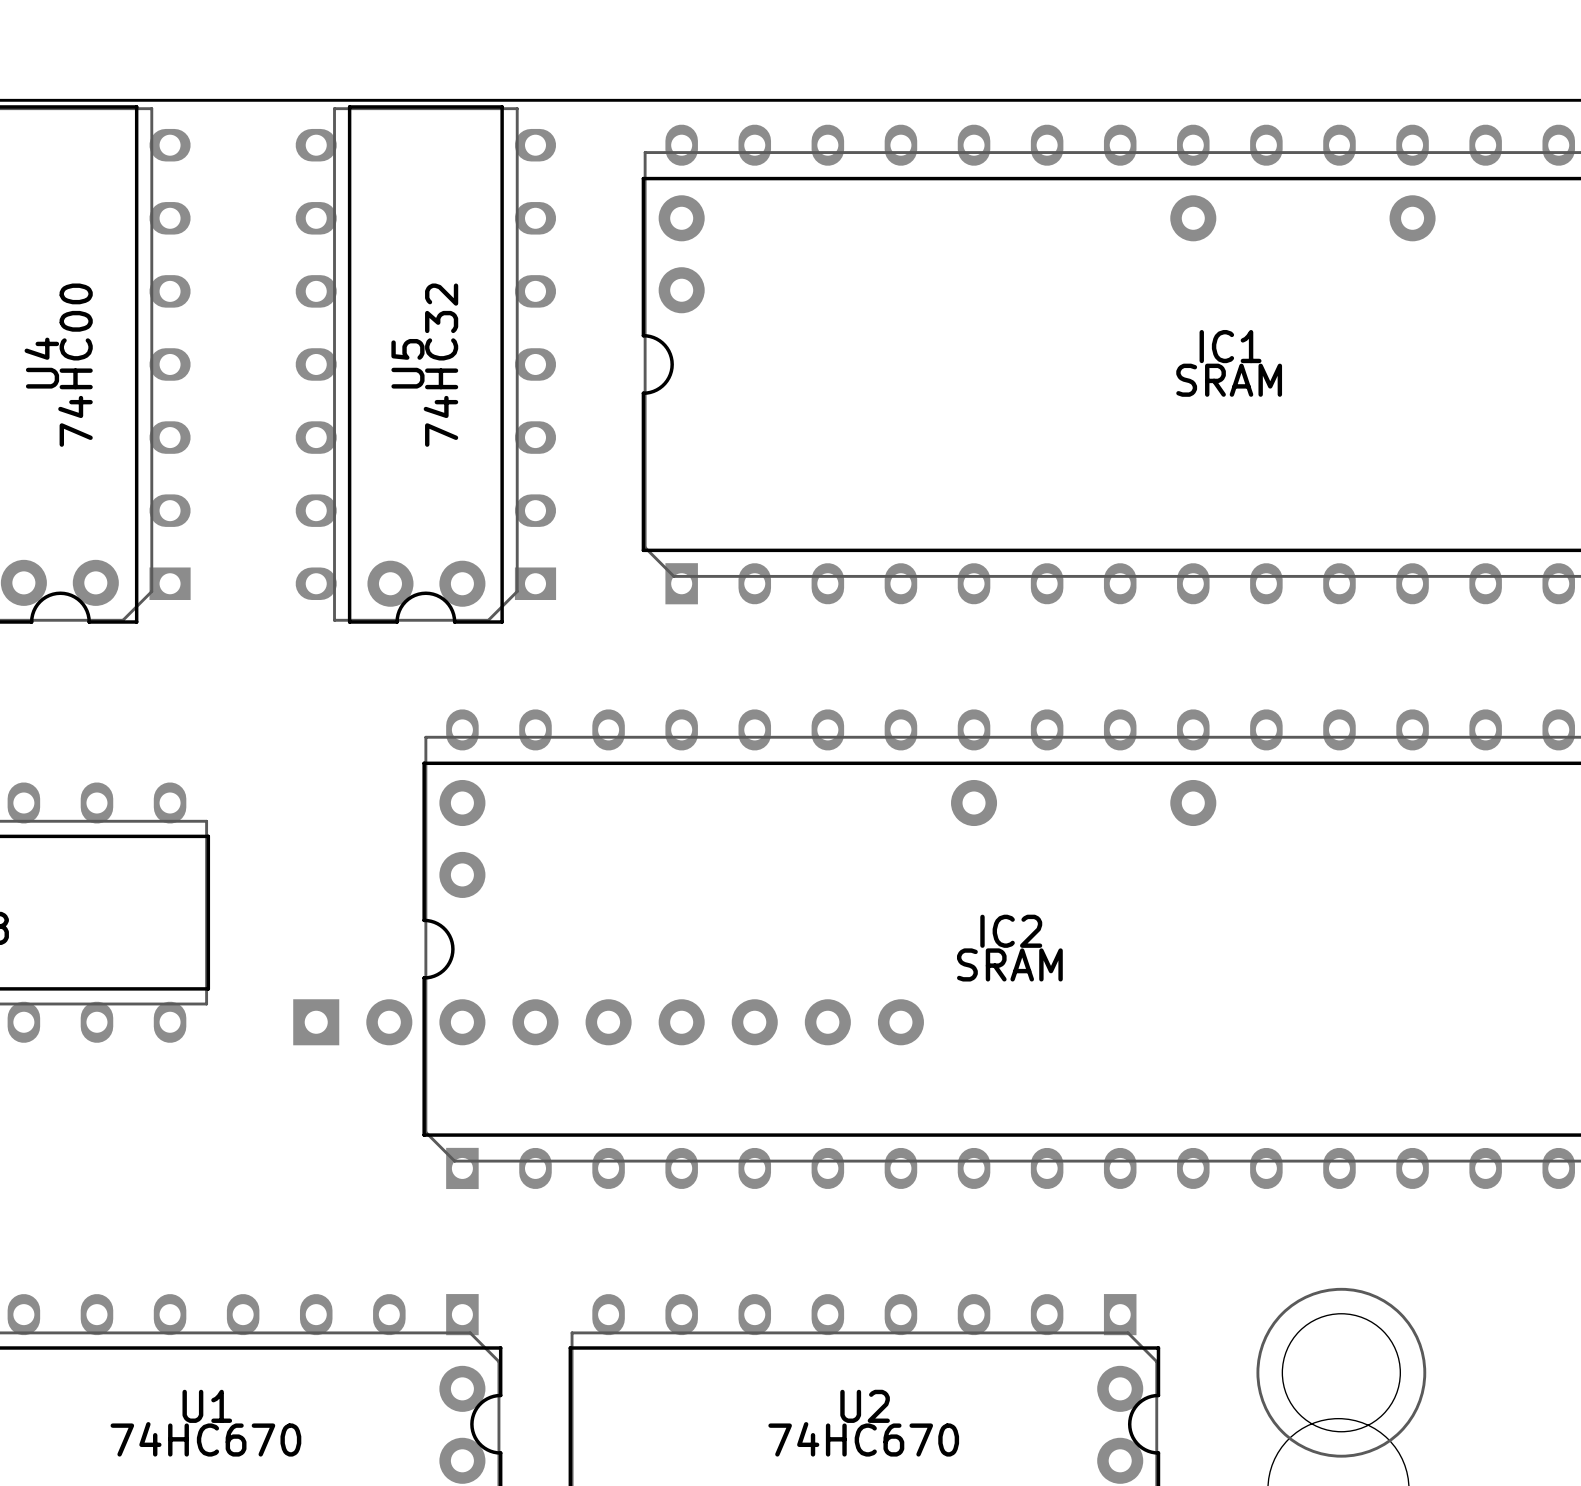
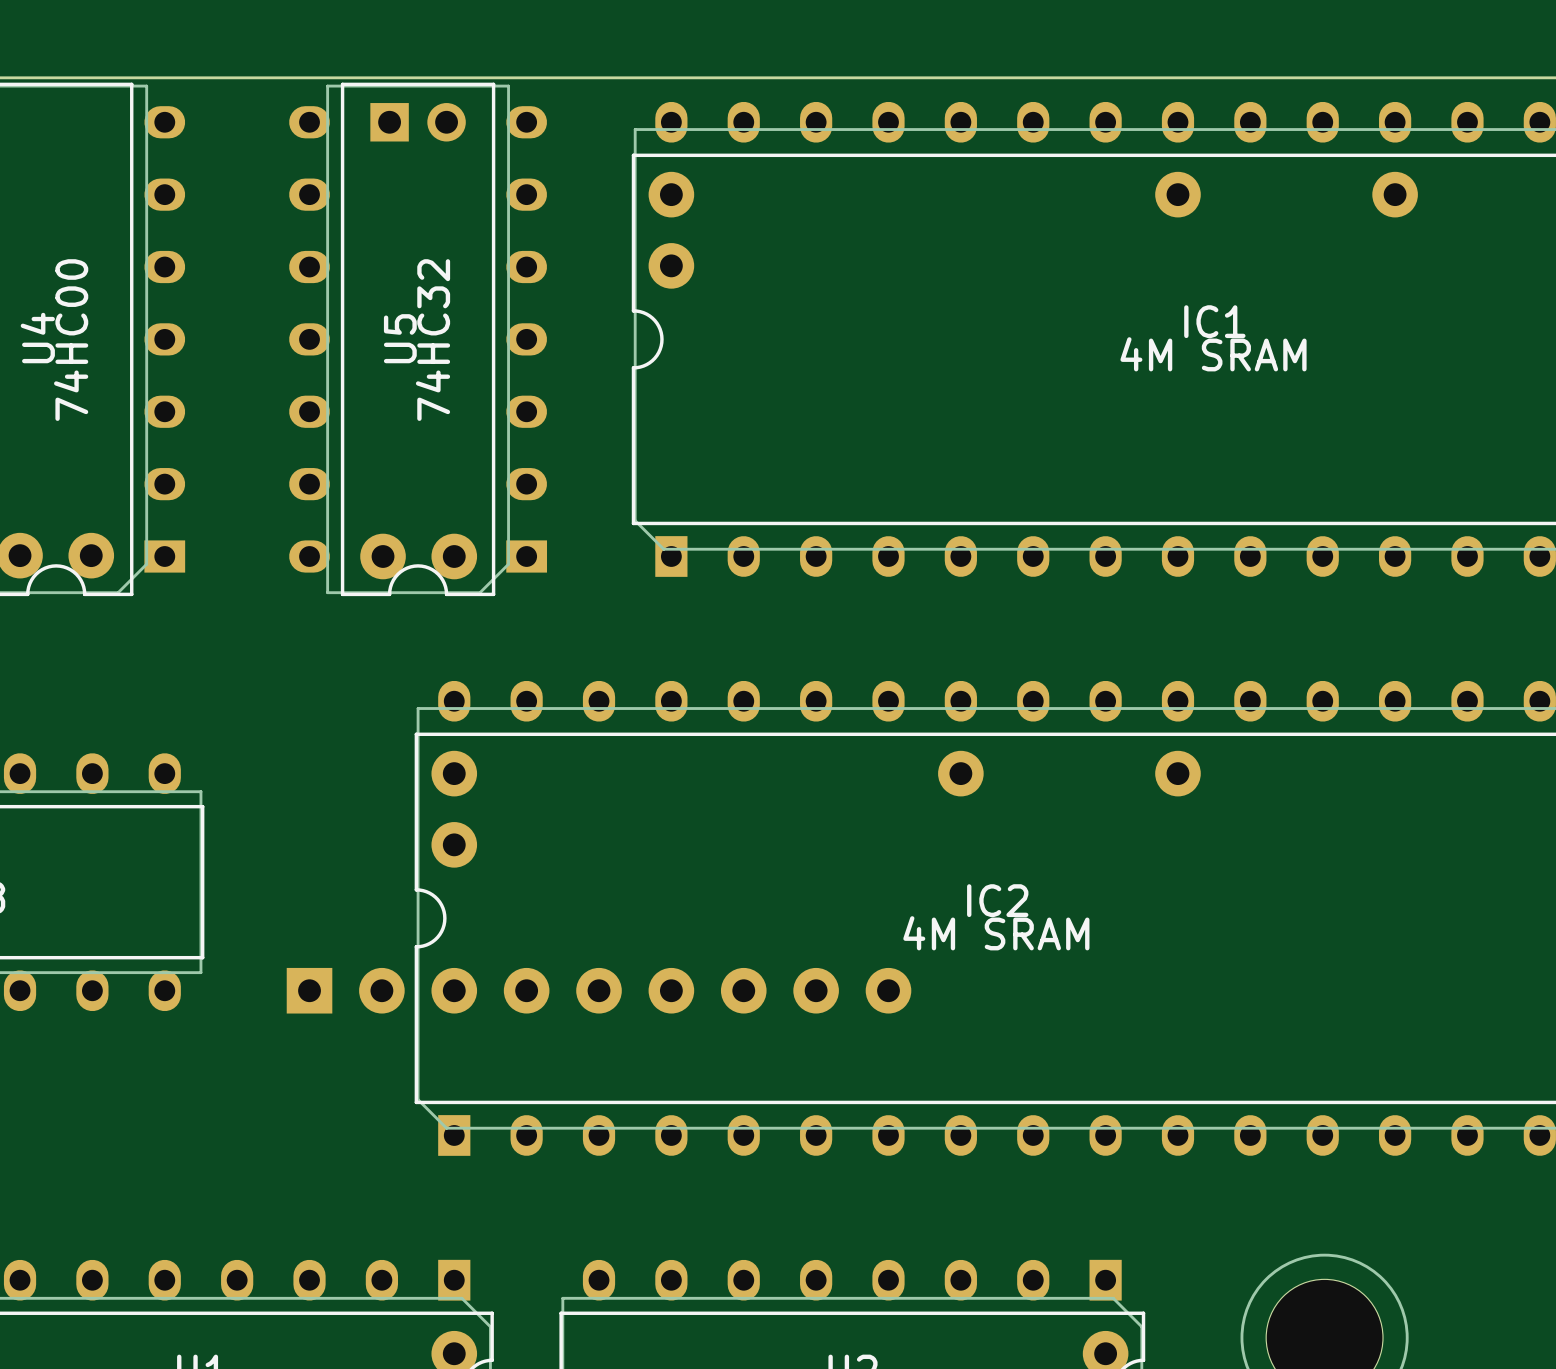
part: none -> (418, 122)
IC1 value: SRAM (1229, 380) -> 4M SRAM (1213, 354)
IC2 value: SRAM (1009, 964) -> 4M SRAM (996, 933)

